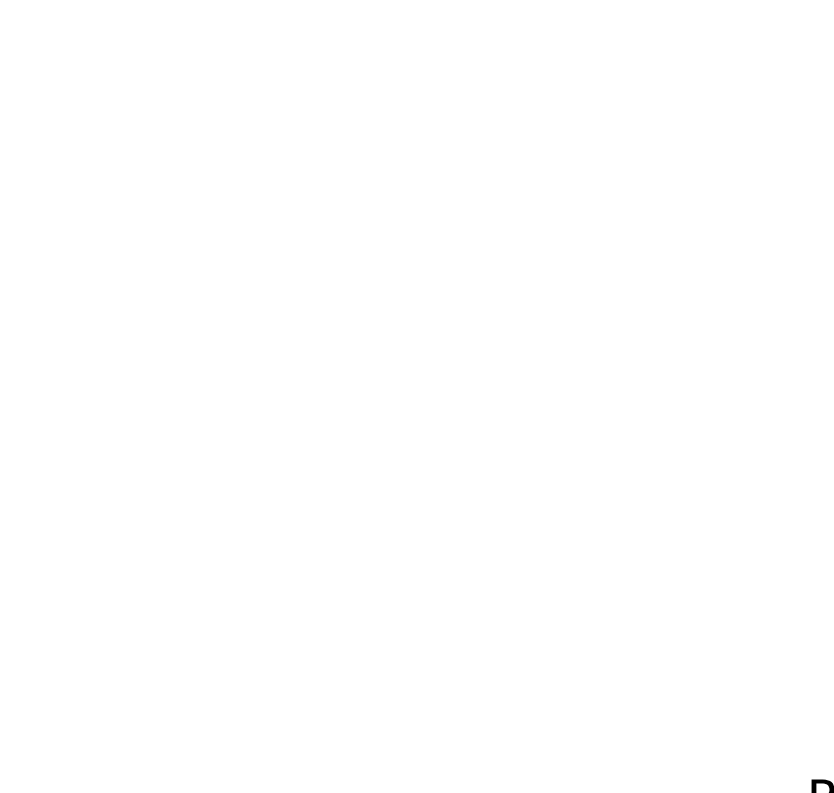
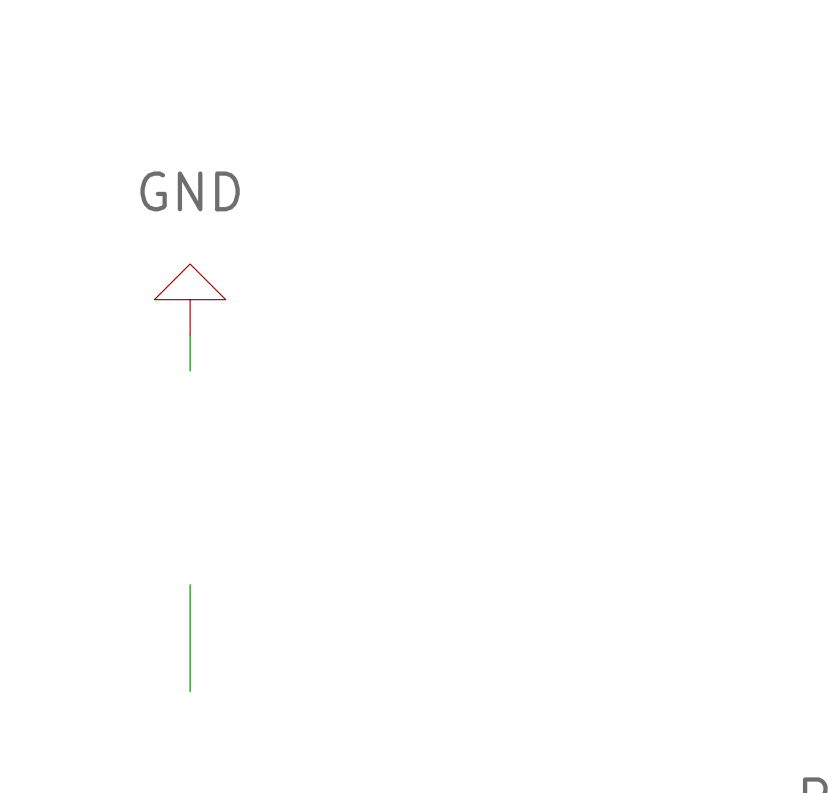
power symbol: none -> GND (190, 299)
wire: none -> (190, 335) (190, 370)
wire: none -> (190, 584) (190, 691)

